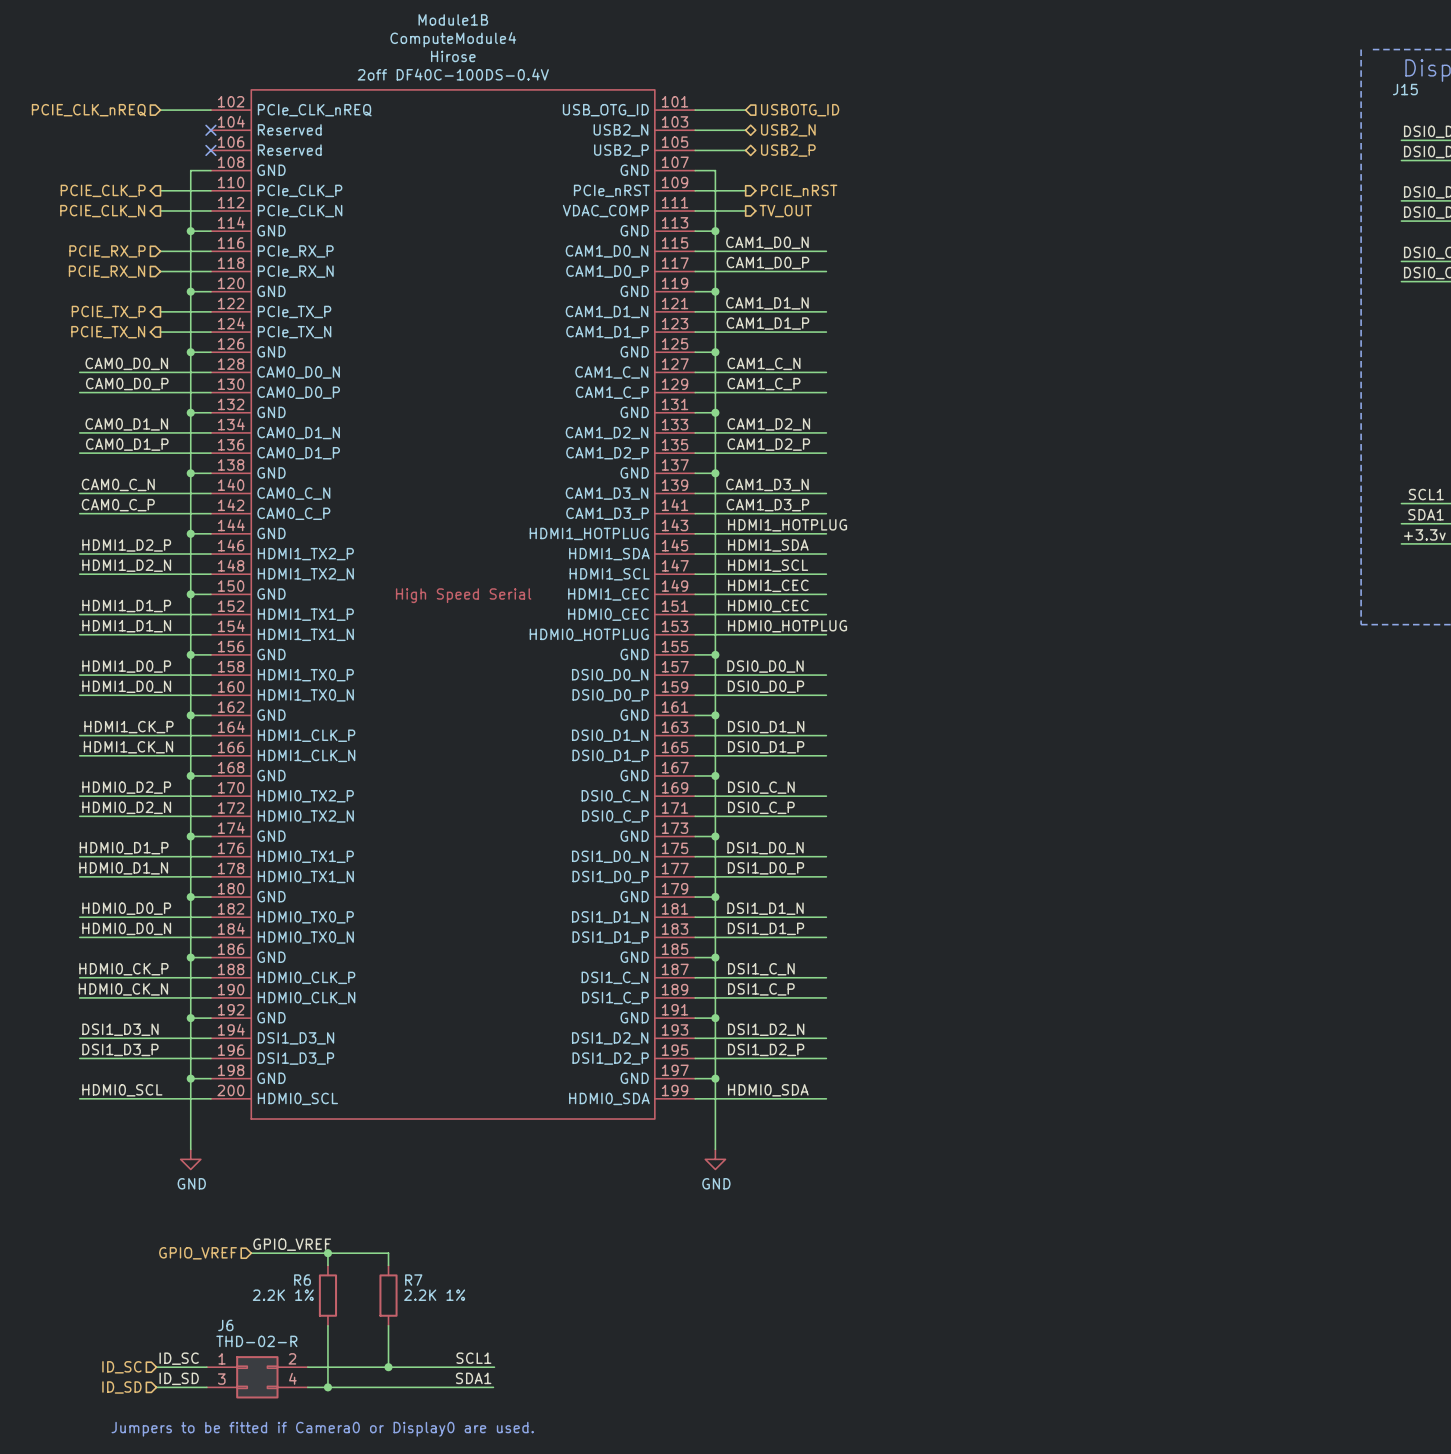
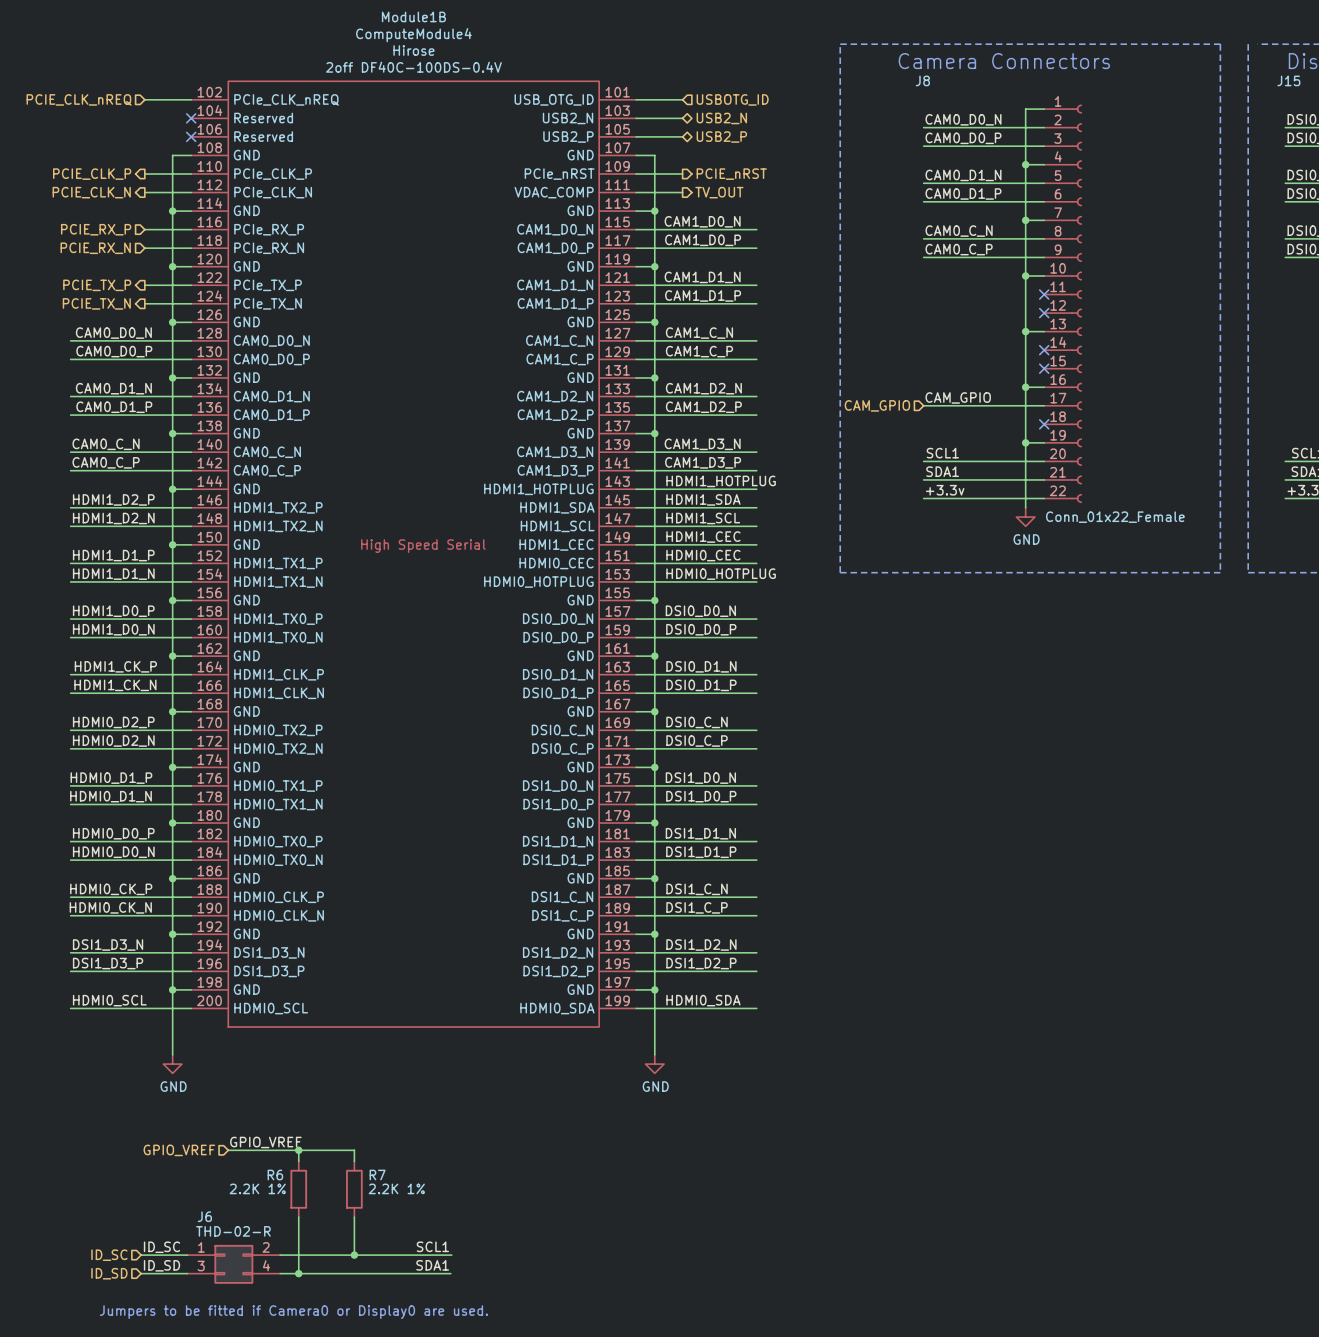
line: none -> (840, 44) (1220, 44) (1220, 572) (840, 572) (840, 44)
text: none -> Camera Connectors (1004, 61)
wire: none -> (1044, 109) (1025, 109) (1025, 507)
label: none -> CAM0_D0_N (963, 119)
wire: none -> (923, 127) (1044, 127)
label: none -> CAM0_D0_P (963, 138)
wire: none -> (923, 146) (1044, 146)
wire: none -> (1025, 164) (1044, 164)
junction: none -> (1025, 164)
label: none -> CAM0_D1_N (963, 175)
wire: none -> (923, 183) (1044, 183)
label: none -> CAM0_D1_P (963, 193)
wire: none -> (923, 201) (1044, 201)
wire: none -> (1025, 220) (1044, 220)
junction: none -> (1025, 220)
label: none -> CAM0_C_N (959, 231)
wire: none -> (923, 238) (1044, 238)
label: none -> CAM0_C_P (959, 249)
wire: none -> (923, 257) (1044, 257)
wire: none -> (1025, 275) (1044, 275)
junction: none -> (1025, 275)
no-connect mark: none -> (1044, 294)
J8: none -> Conn_01x22_Female (1062, 303)
no-connect mark: none -> (1044, 313)
wire: none -> (1025, 331) (1044, 331)
junction: none -> (1025, 331)
no-connect mark: none -> (1044, 350)
no-connect mark: none -> (1044, 368)
wire: none -> (1025, 387) (1044, 387)
junction: none -> (1025, 387)
label: none -> CAM_GPIO (958, 397)
hierarchical label: none -> CAM_GPIO (877, 405)
wire: none -> (923, 405) (1044, 405)
no-connect mark: none -> (1044, 424)
wire: none -> (1025, 442) (1044, 442)
junction: none -> (1025, 442)
label: none -> SCL1 (942, 453)
wire: none -> (923, 461) (1044, 461)
label: none -> SDA1 (942, 471)
wire: none -> (923, 479) (1044, 479)
label: none -> +3.3v (945, 490)
wire: none -> (923, 498) (1044, 498)
power symbol: none -> GND (1025, 517)

